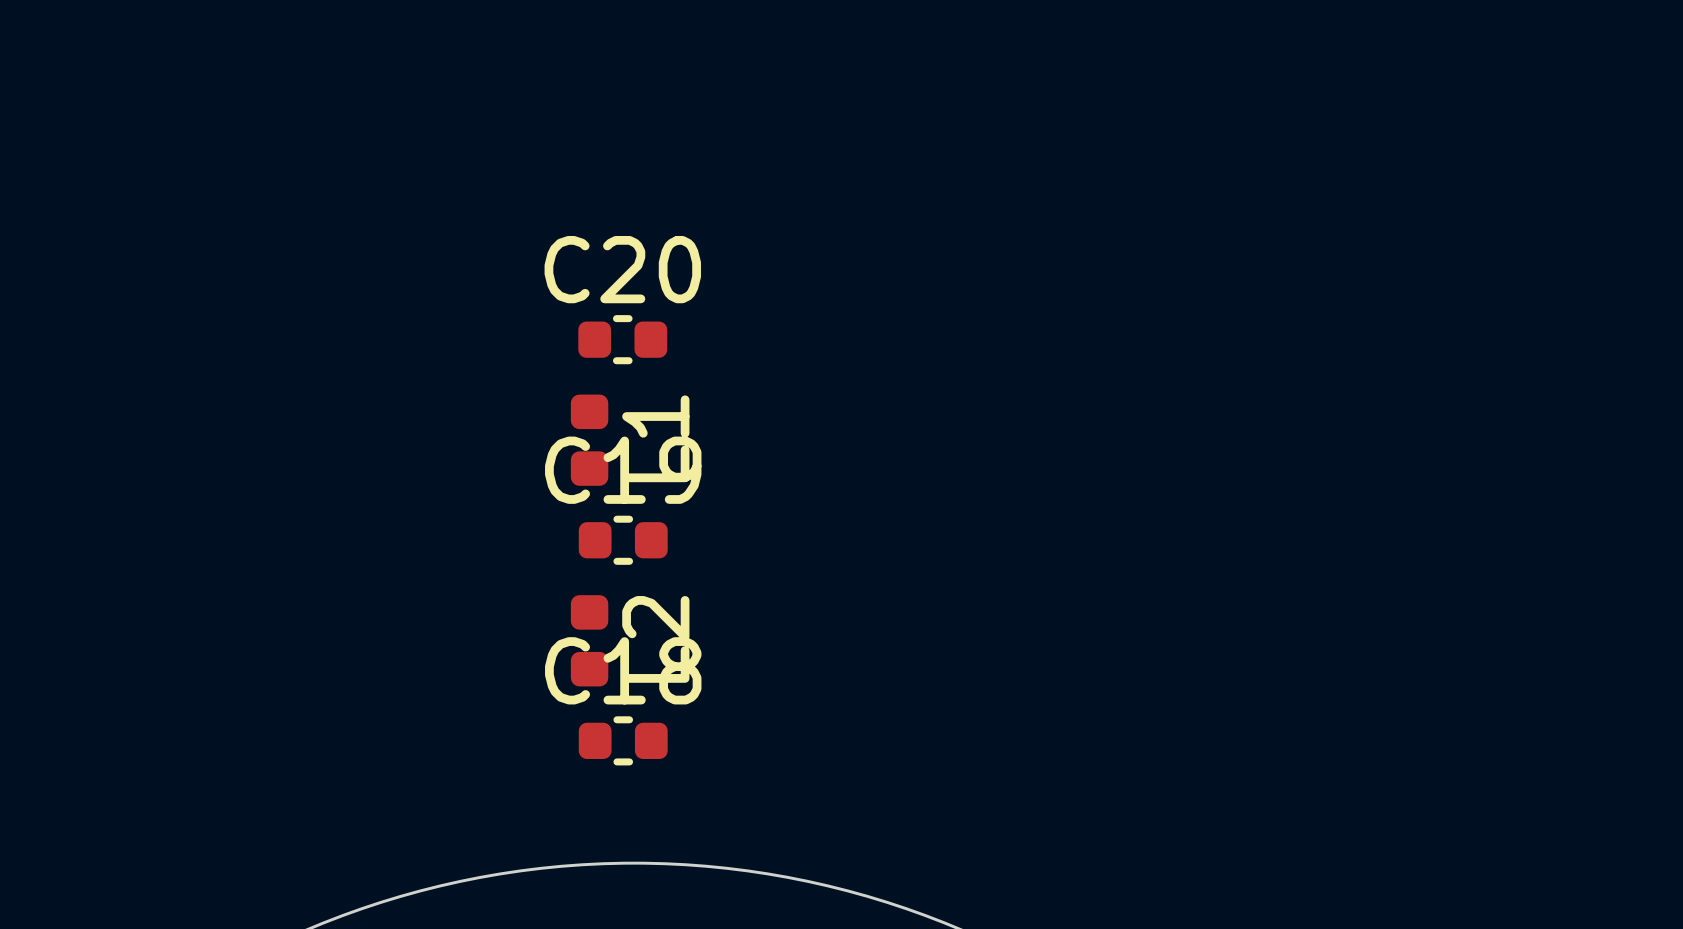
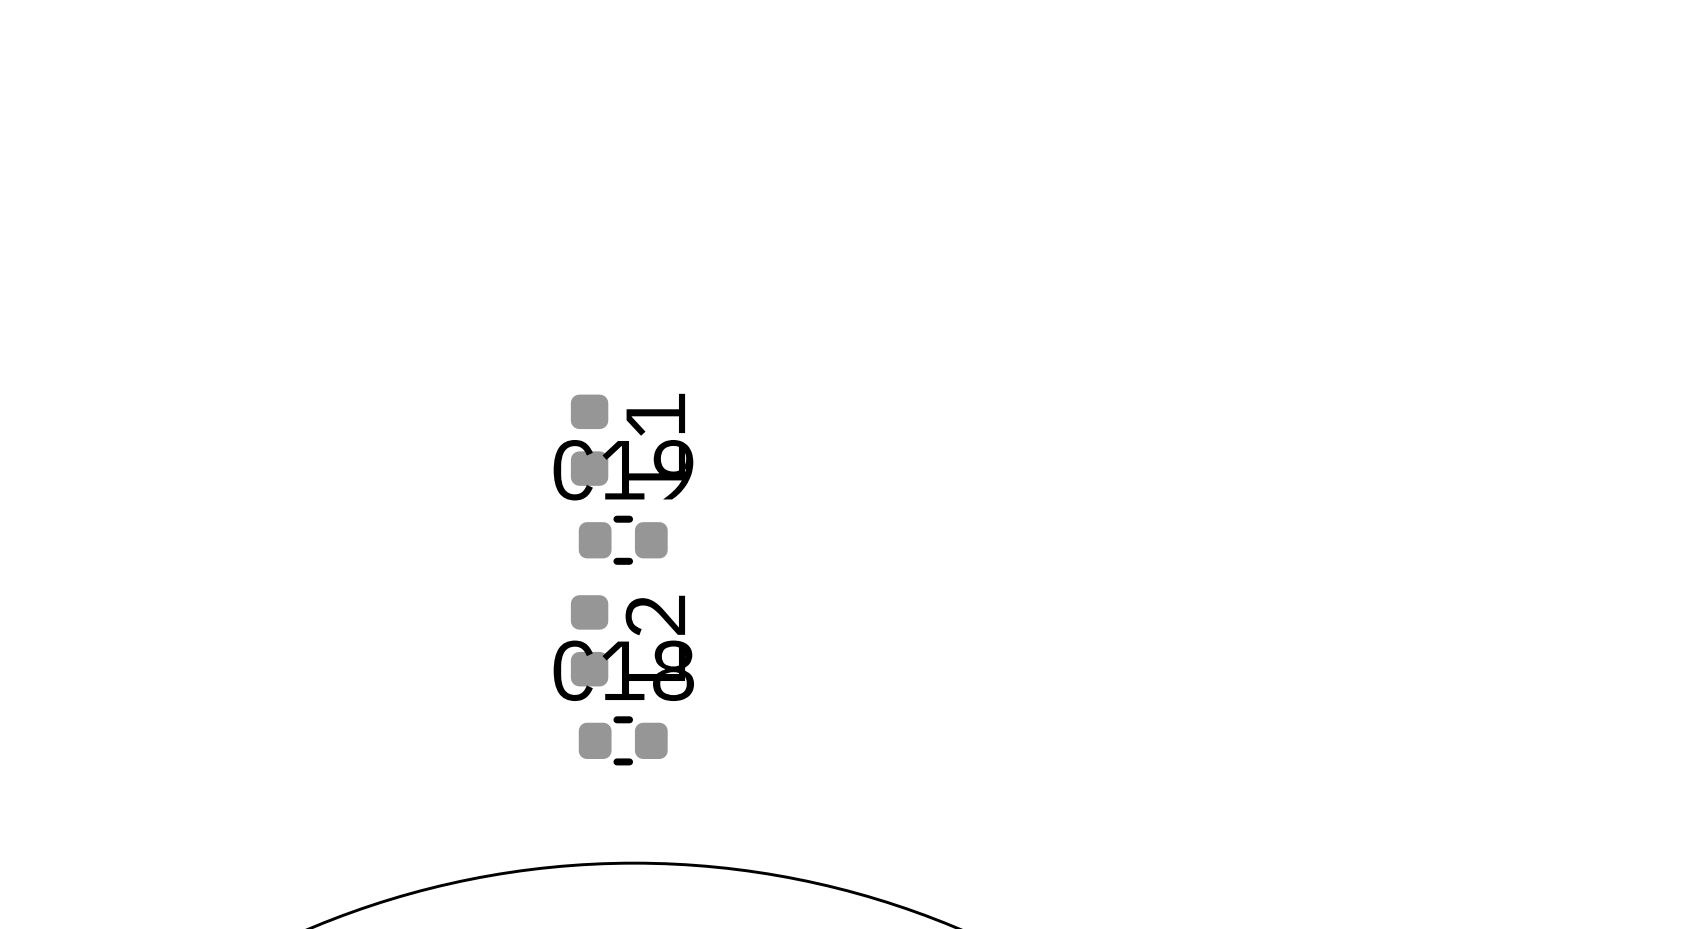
C20: (622, 339) -> none

